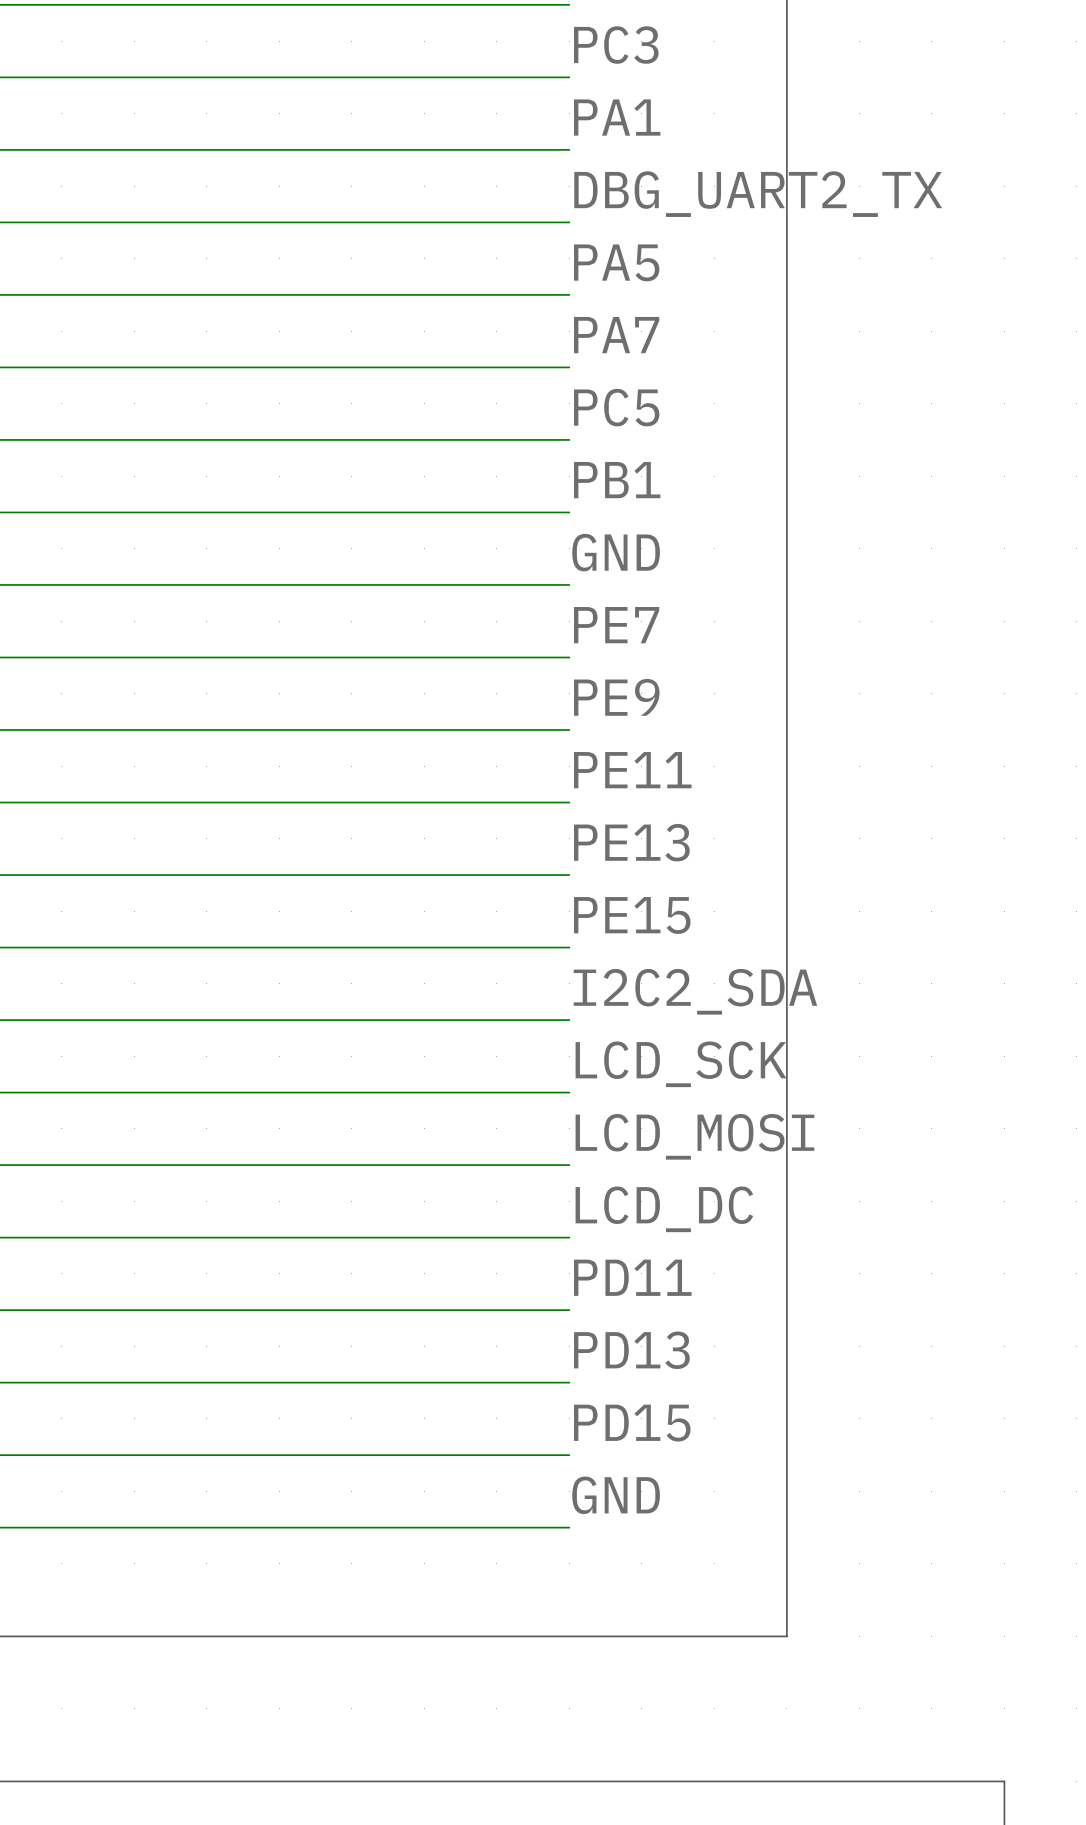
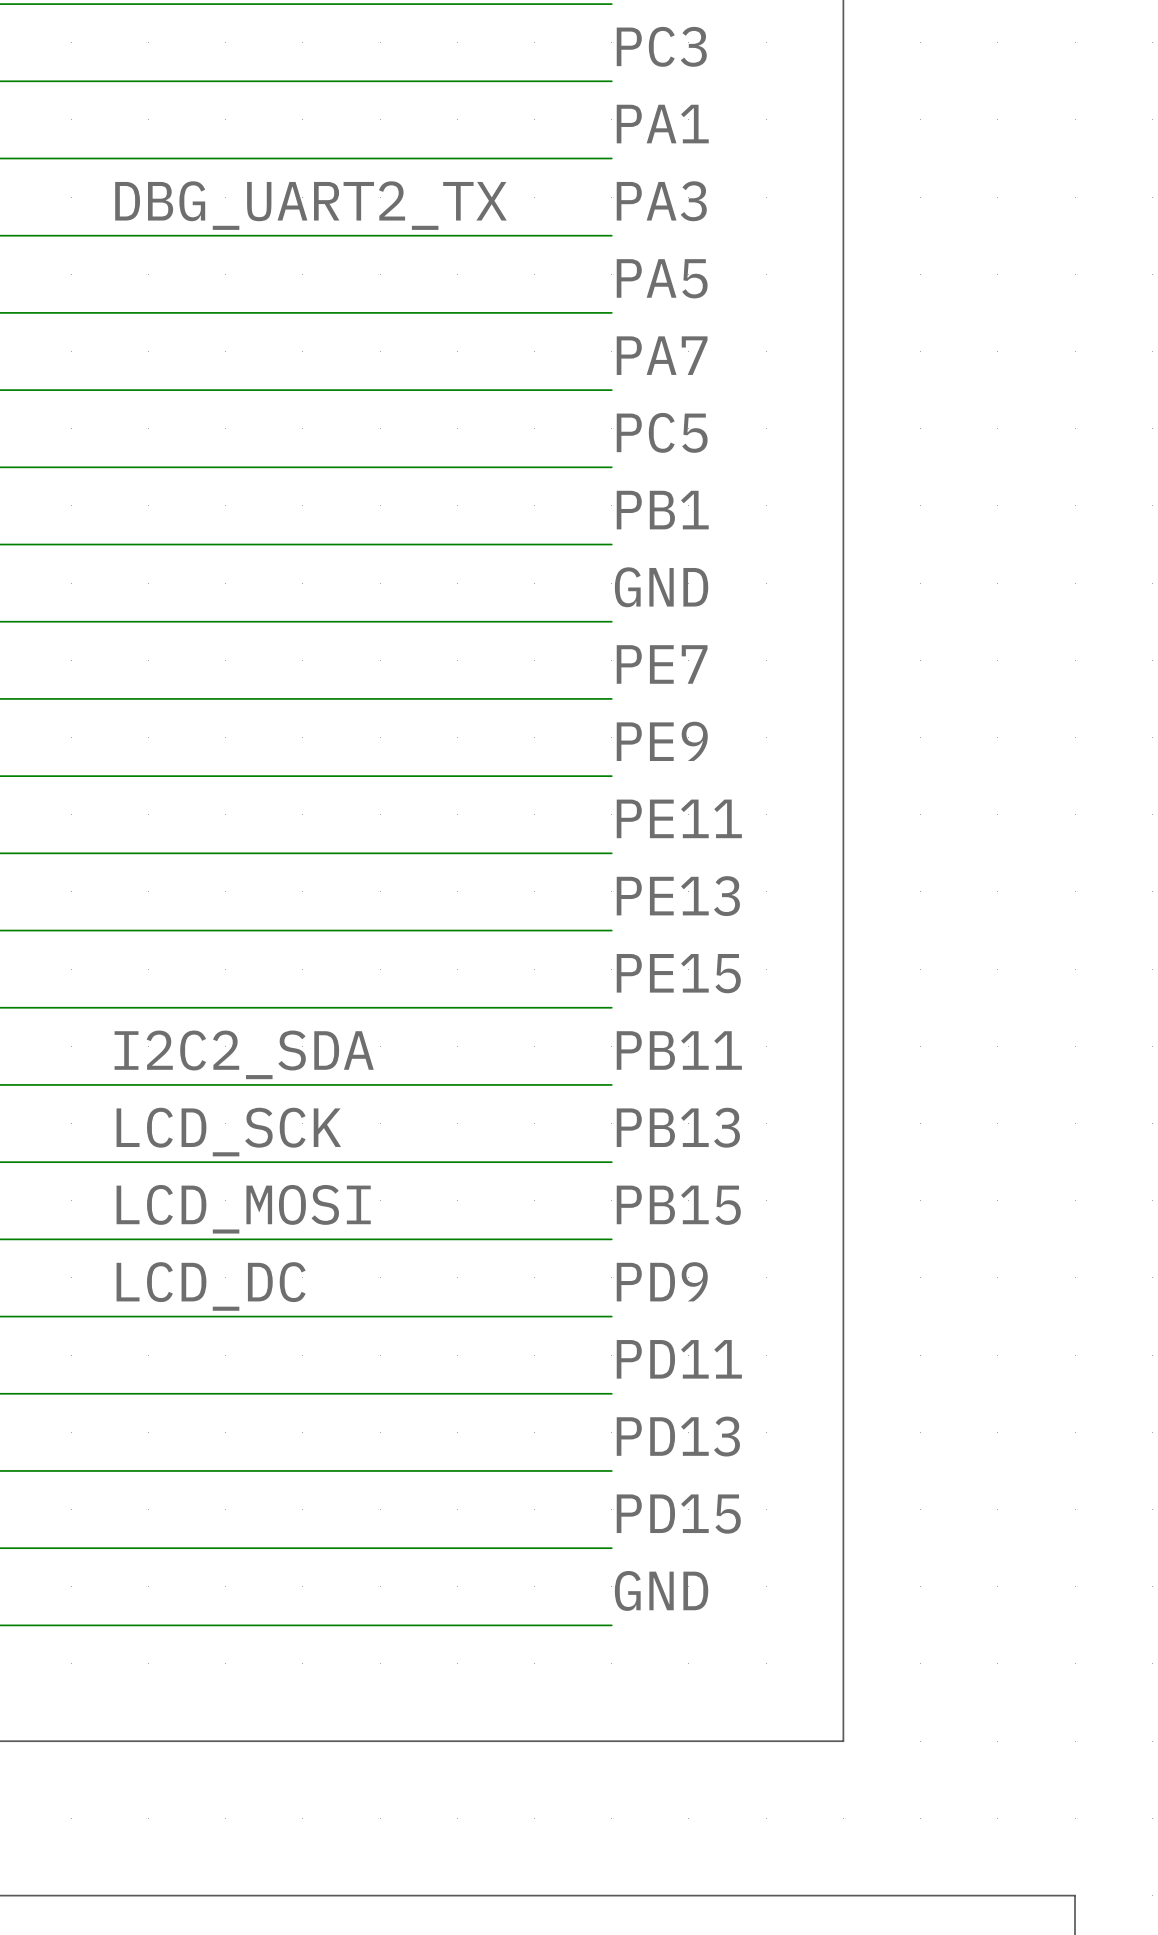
label: none -> DBG_UART2_TX (310, 205)
label: DBG_UART2_TX (758, 194) -> PA3 (661, 201)
label: none -> I2C2_SDA (244, 1054)
label: I2C2_SDA (695, 991) -> PB11 (679, 1050)
label: none -> LCD_SCK (228, 1132)
label: LCD_SCK (680, 1064) -> PB13 (678, 1127)
label: none -> LCD_MOSI (243, 1209)
label: LCD_MOSI (694, 1136) -> PB15 (678, 1205)
label: none -> LCD_DC (211, 1286)
label: LCD_DC (664, 1209) -> PD9 (662, 1281)

